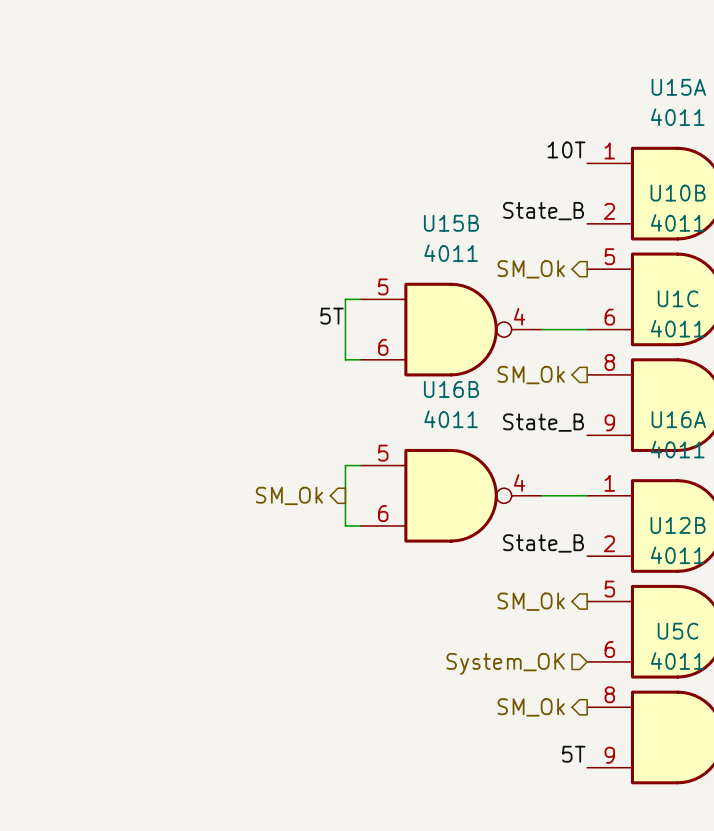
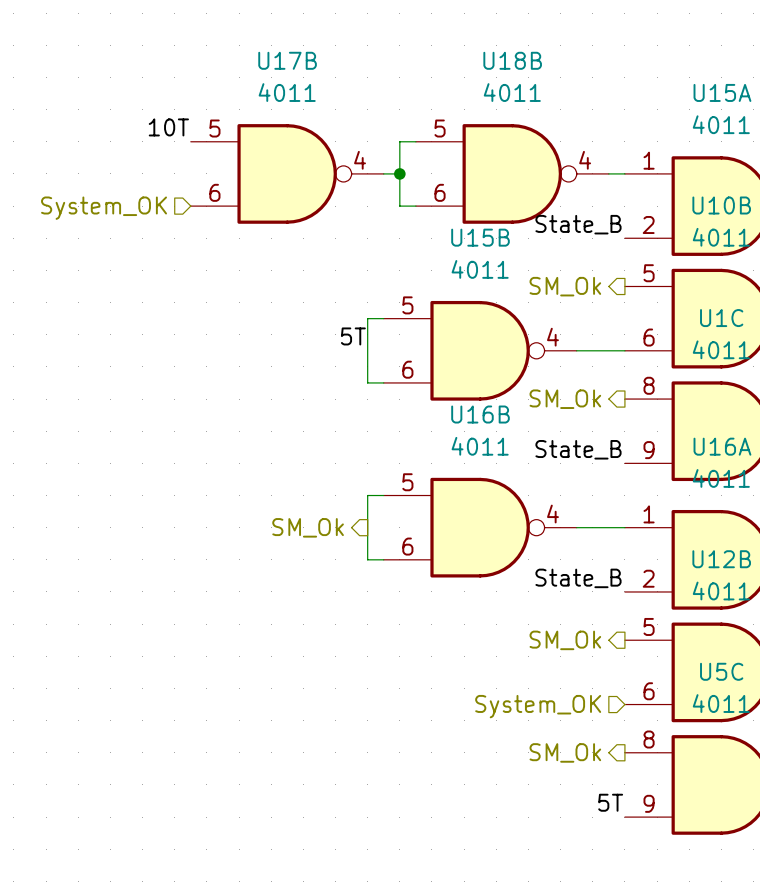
label: none -> 10T (168, 127)
wire: none -> (415, 141) (399, 141) (399, 206) (415, 206)
label: 10T (566, 149) -> none
U17B: none -> 4011 (287, 173)
wire: none -> (383, 173) (399, 173)
junction: none -> (399, 173)
U18B: none -> 4011 (512, 173)
wire: none -> (608, 173) (624, 173)
hierarchical label: none -> System_OK (104, 208)

